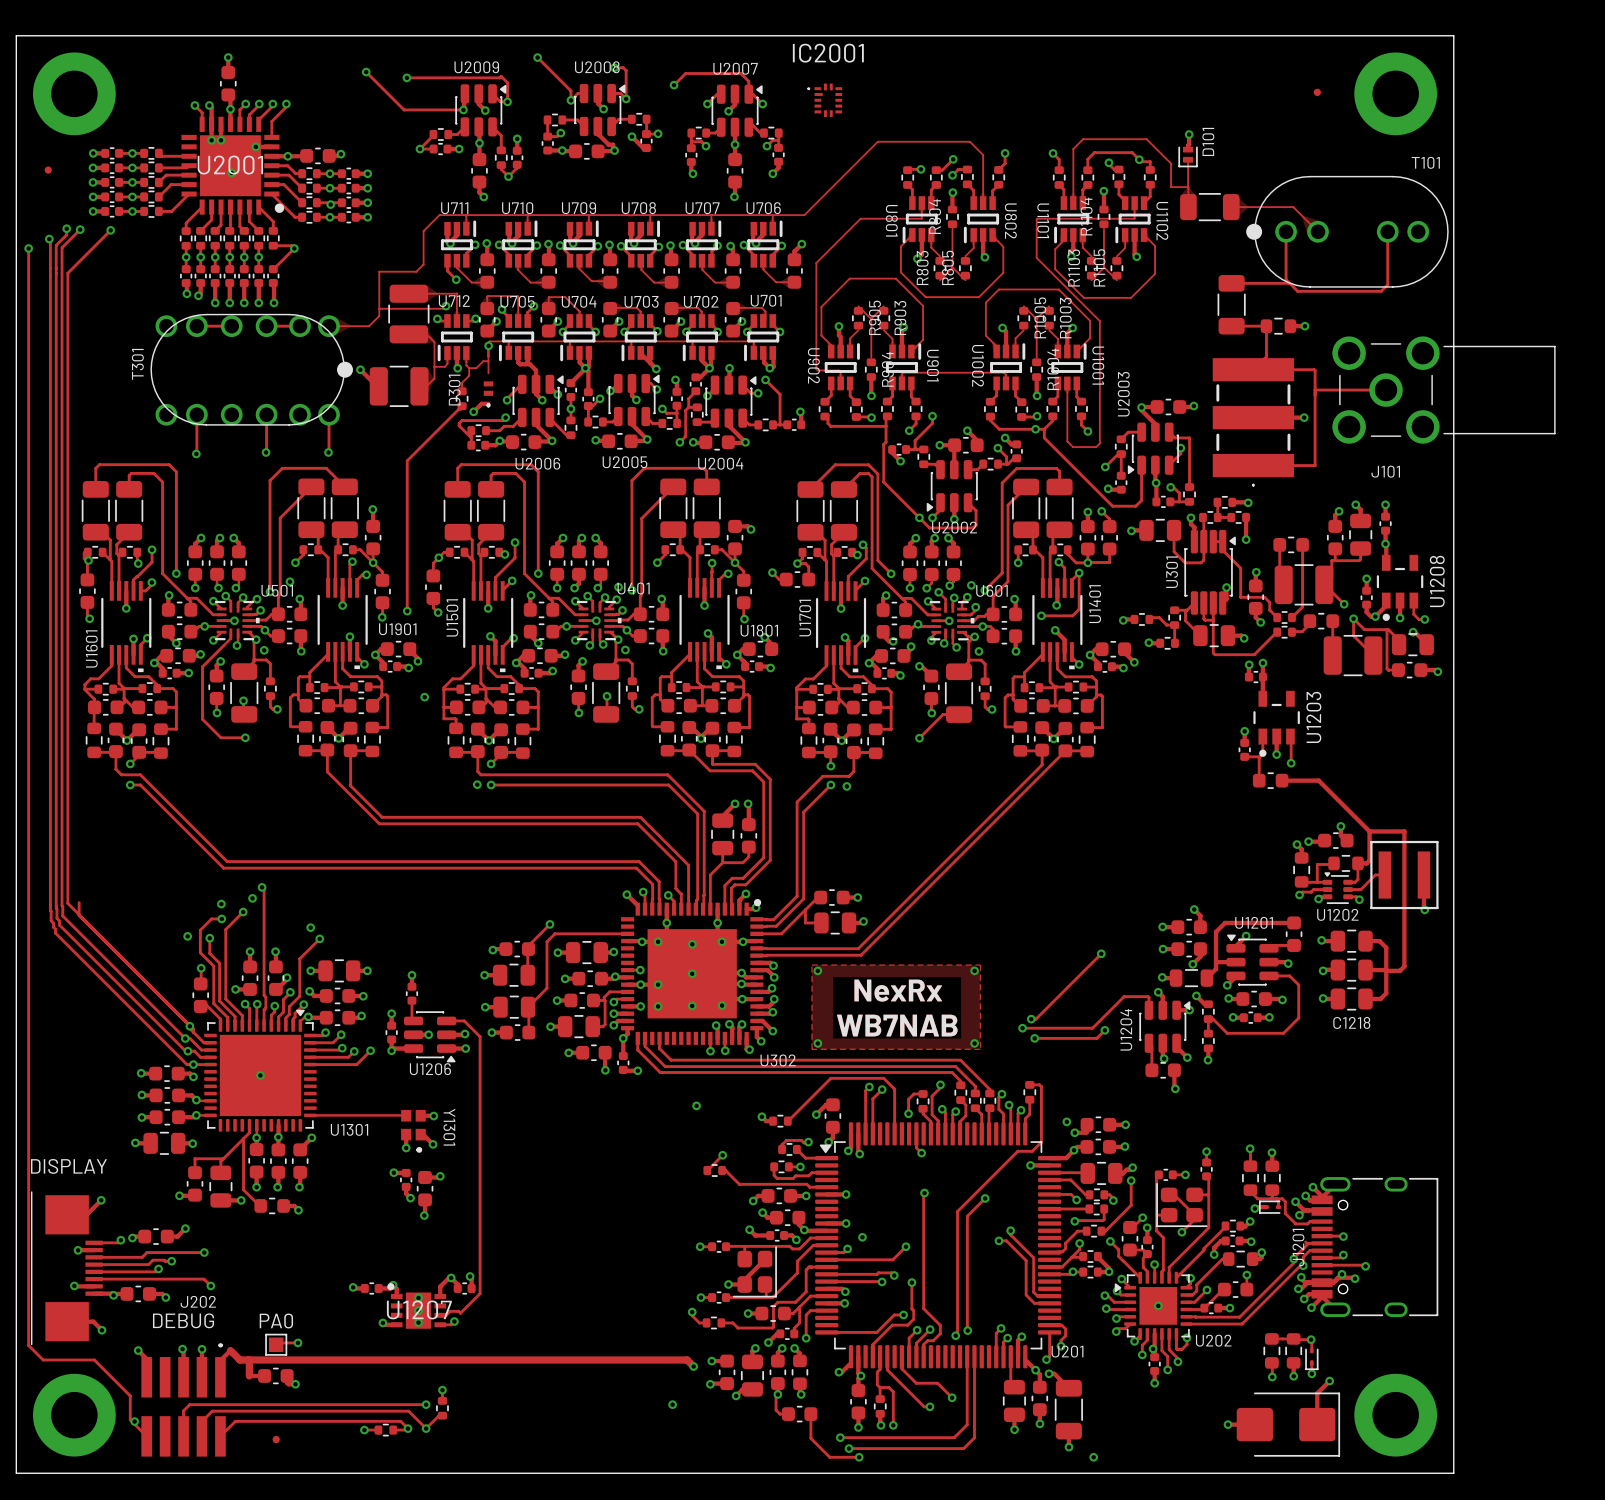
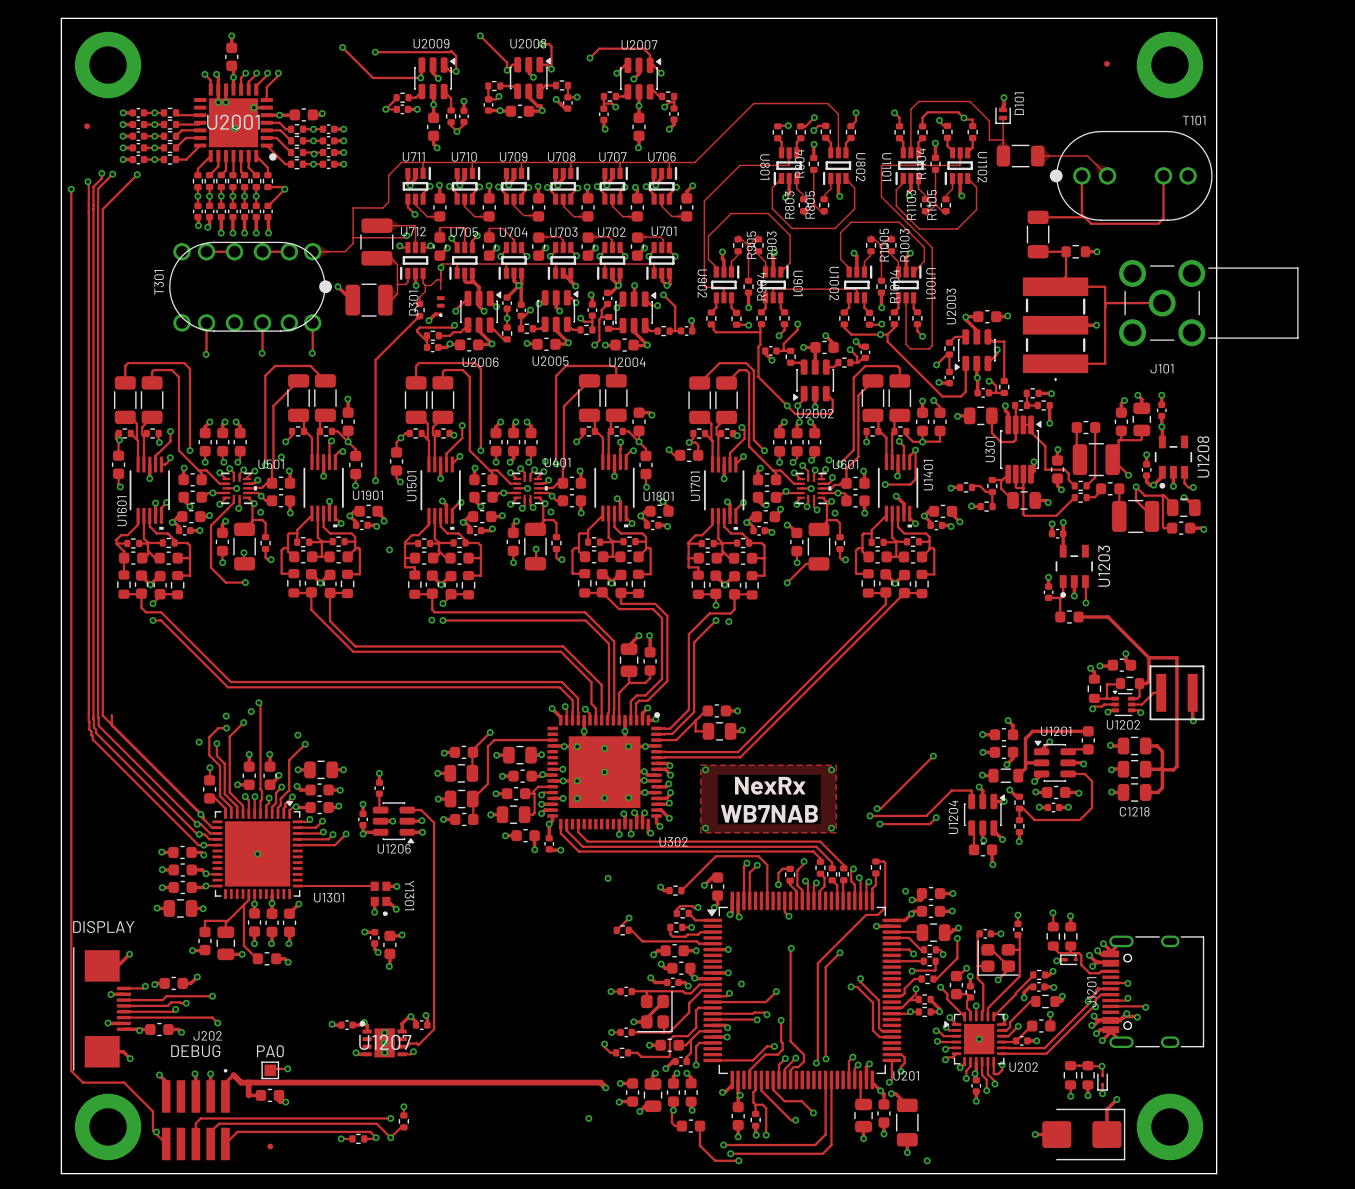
IC2001: (824, 100) -> none

